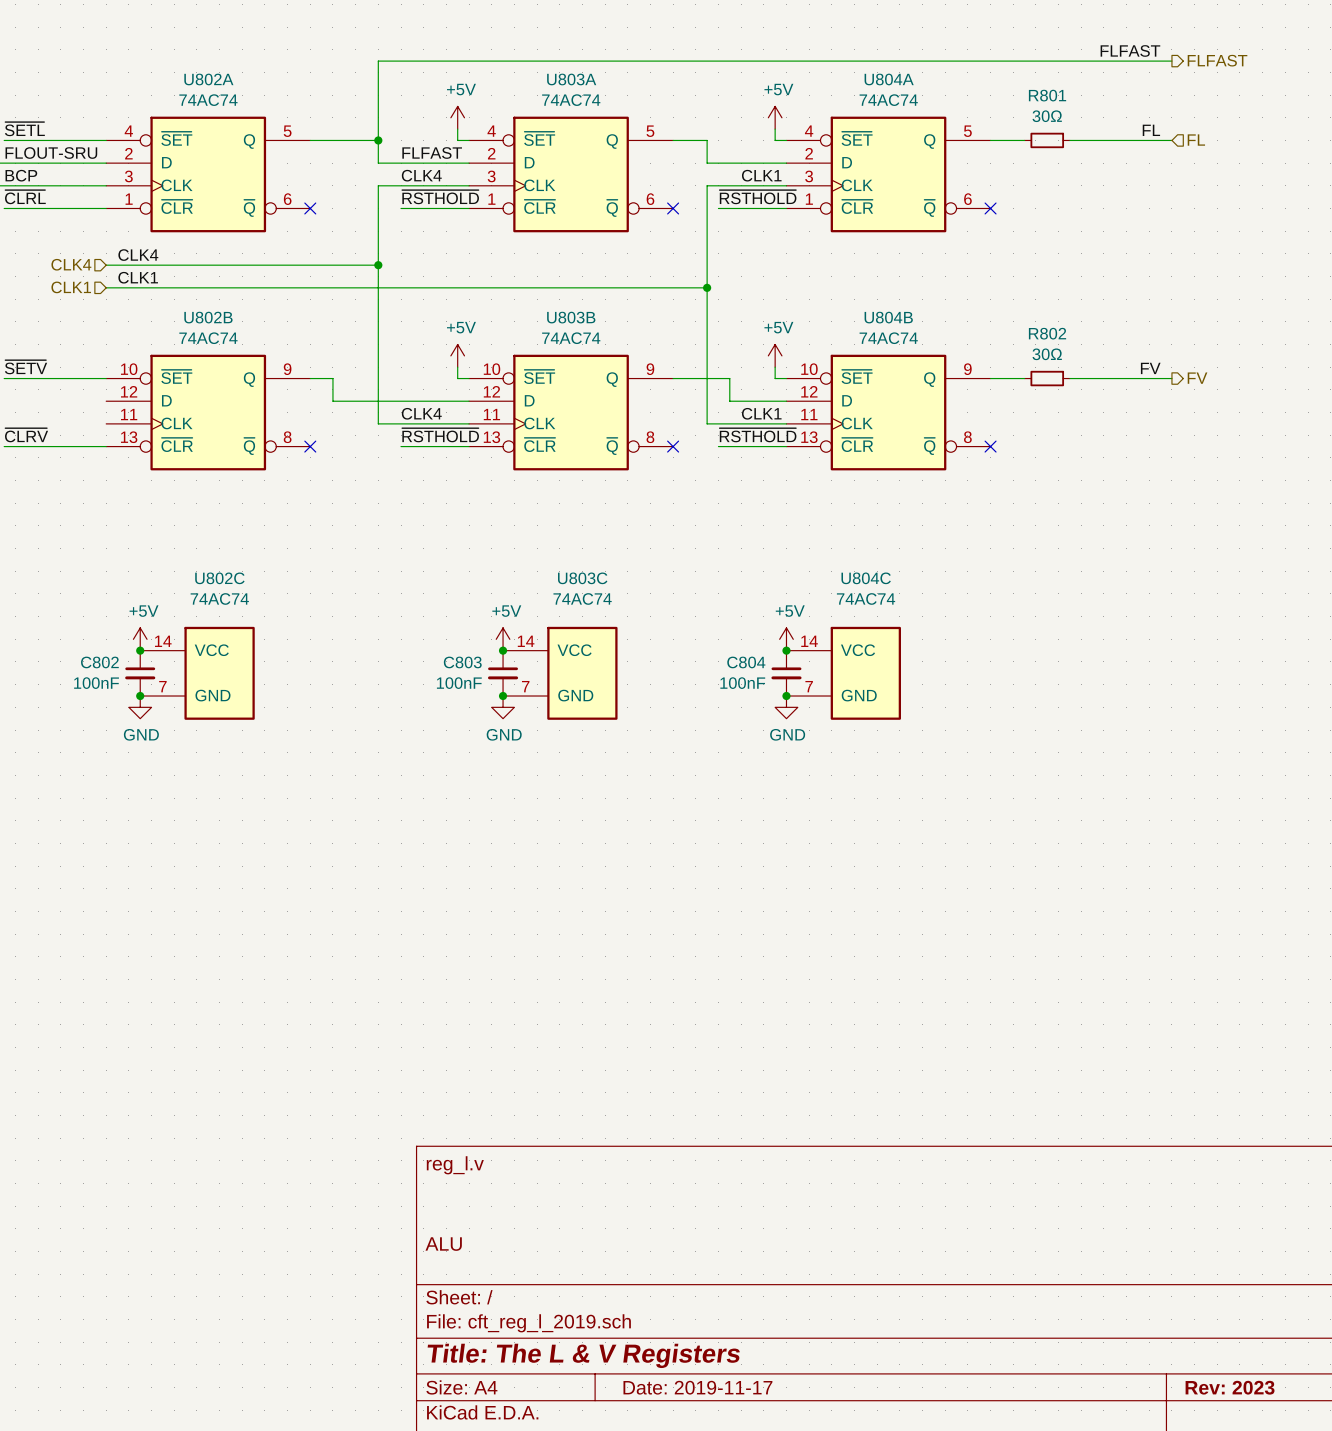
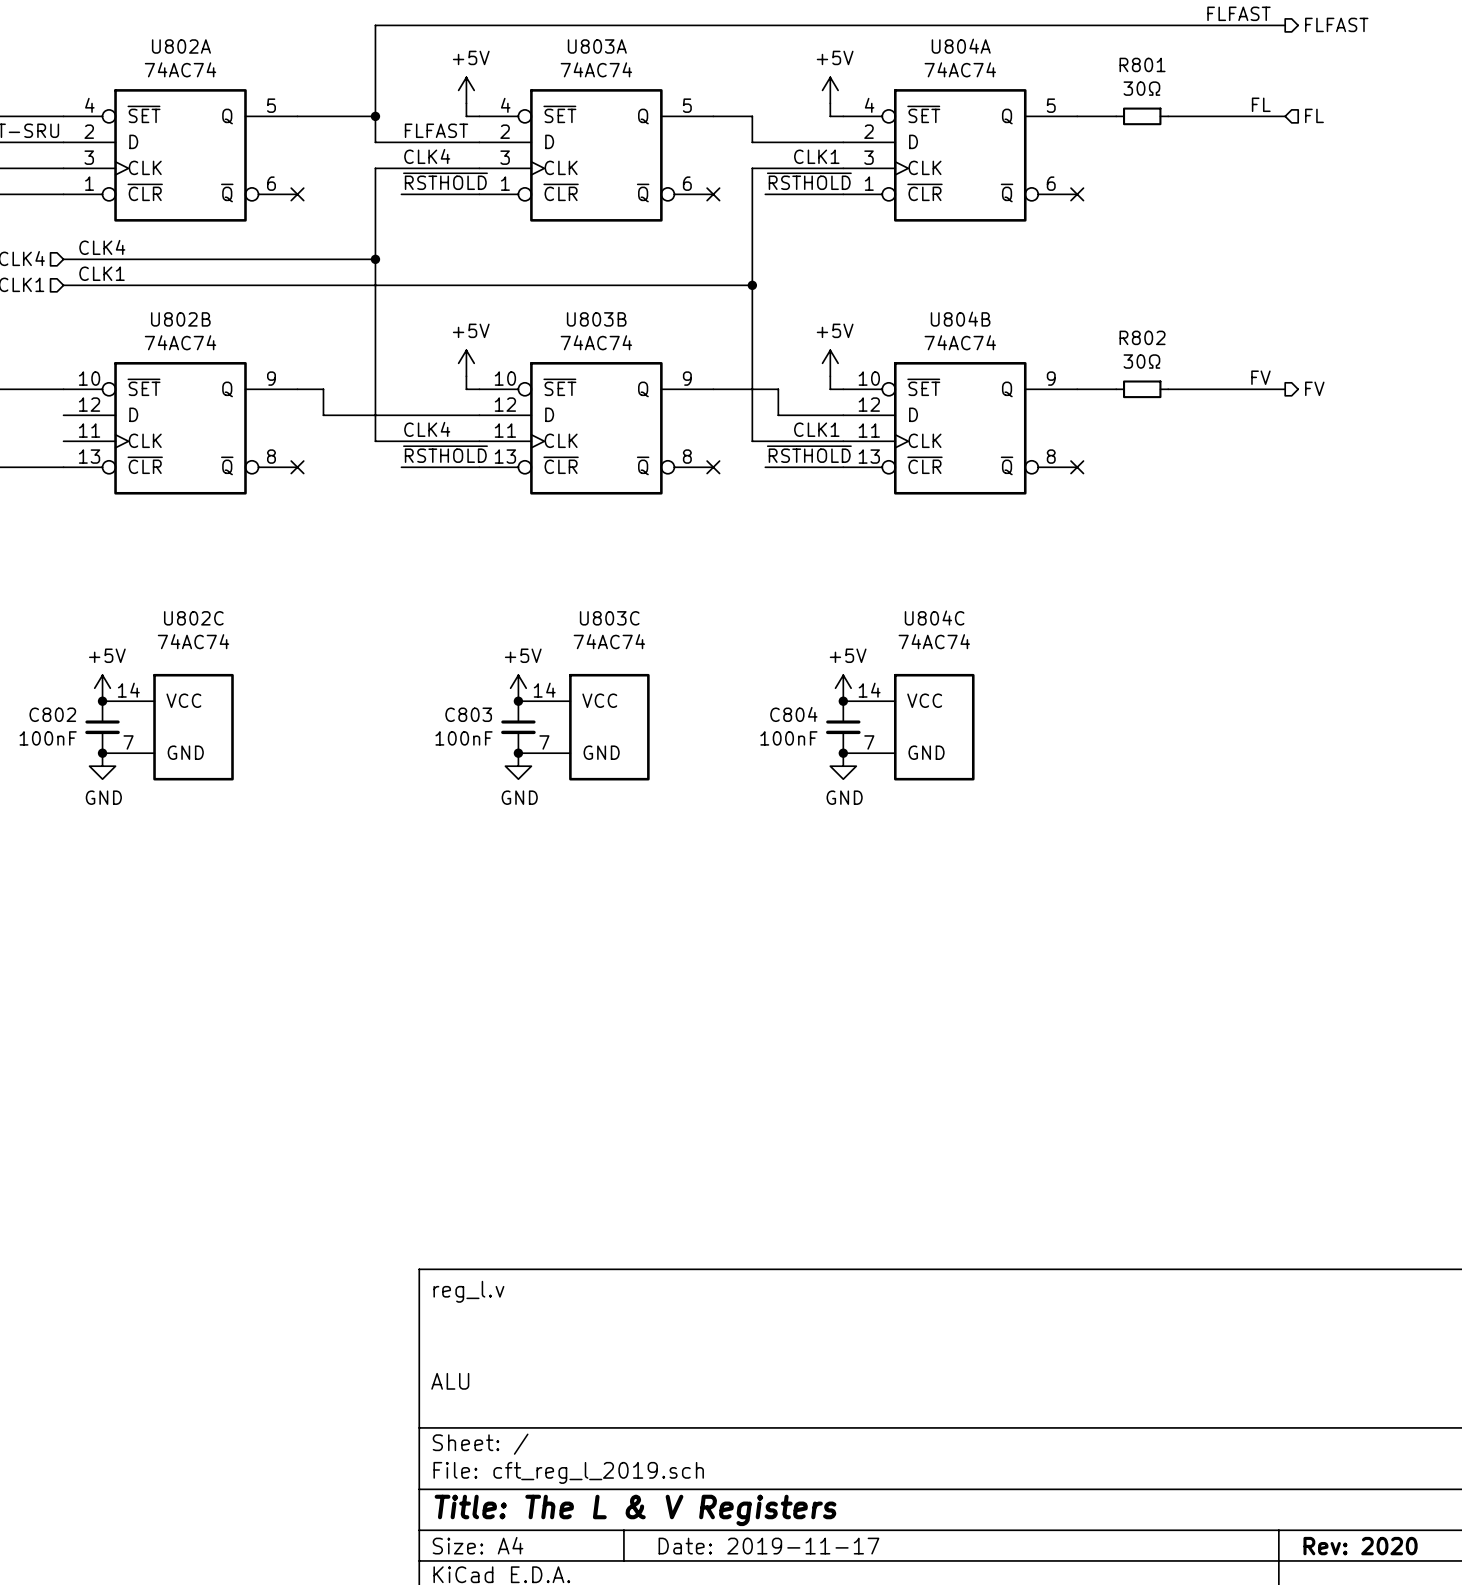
title block: Rev: 2023 (1230, 1387) -> Rev: 2020 (1360, 1546)

